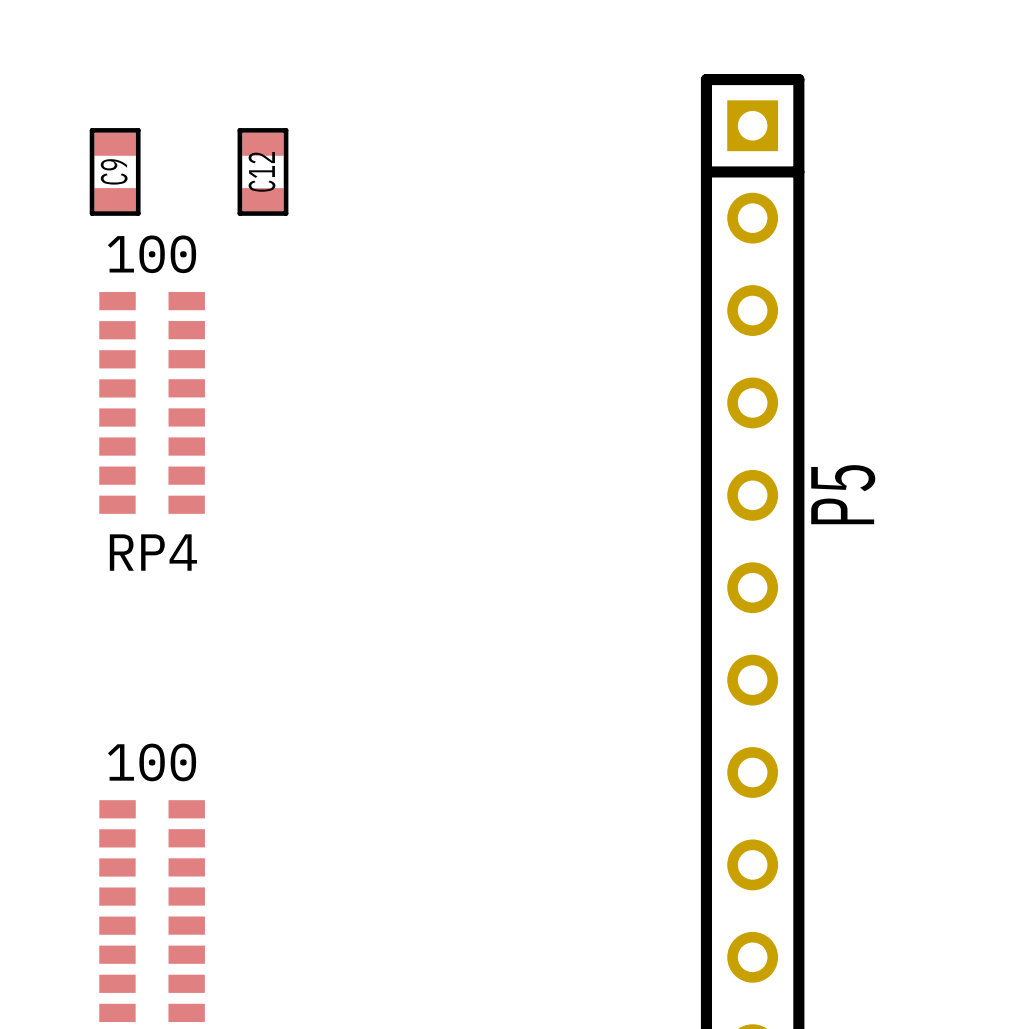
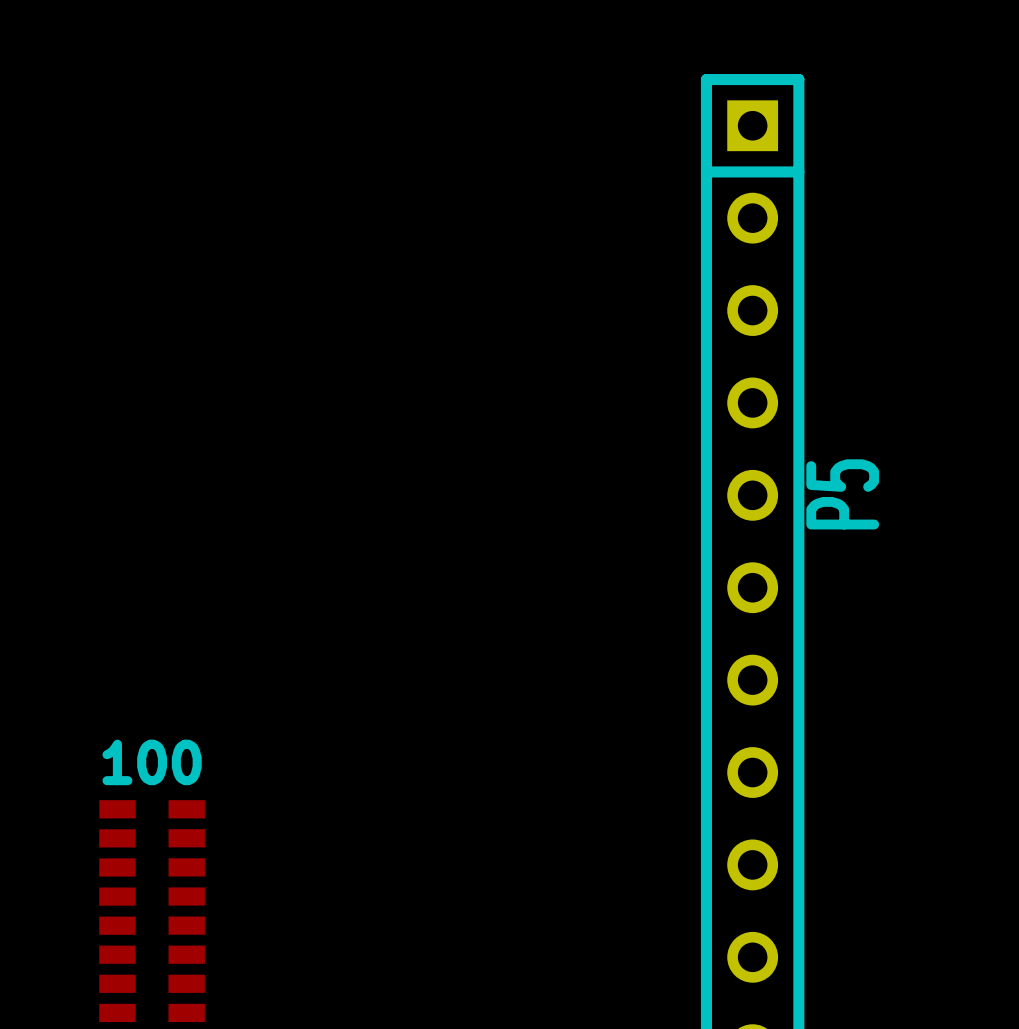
C9: (115, 171) -> none
C12: (262, 171) -> none
RP4: 100 (152, 402) -> none

